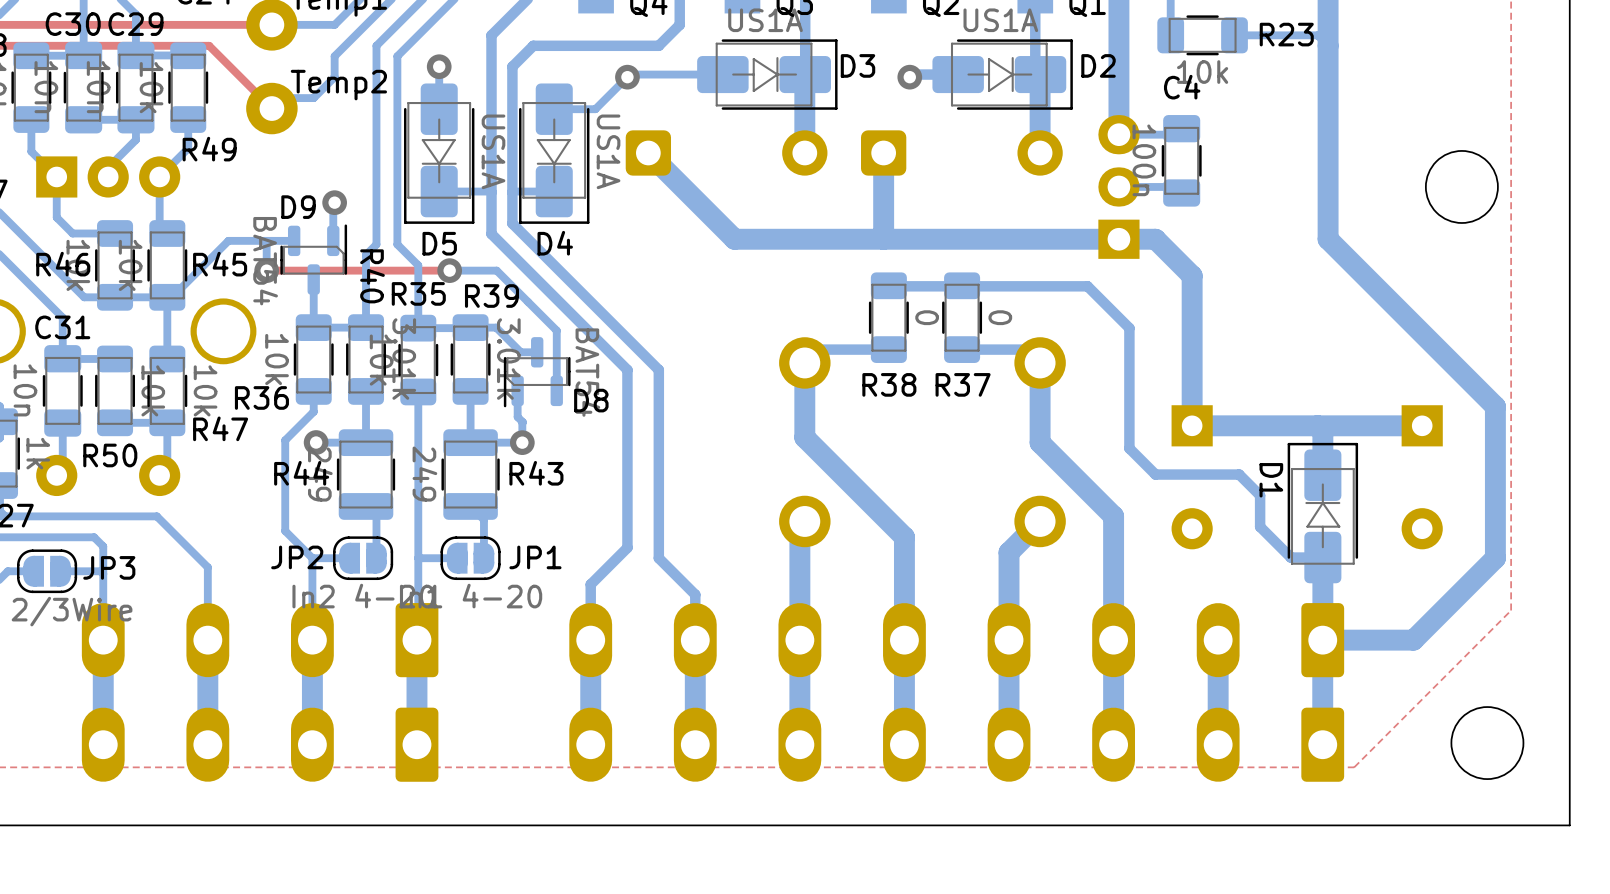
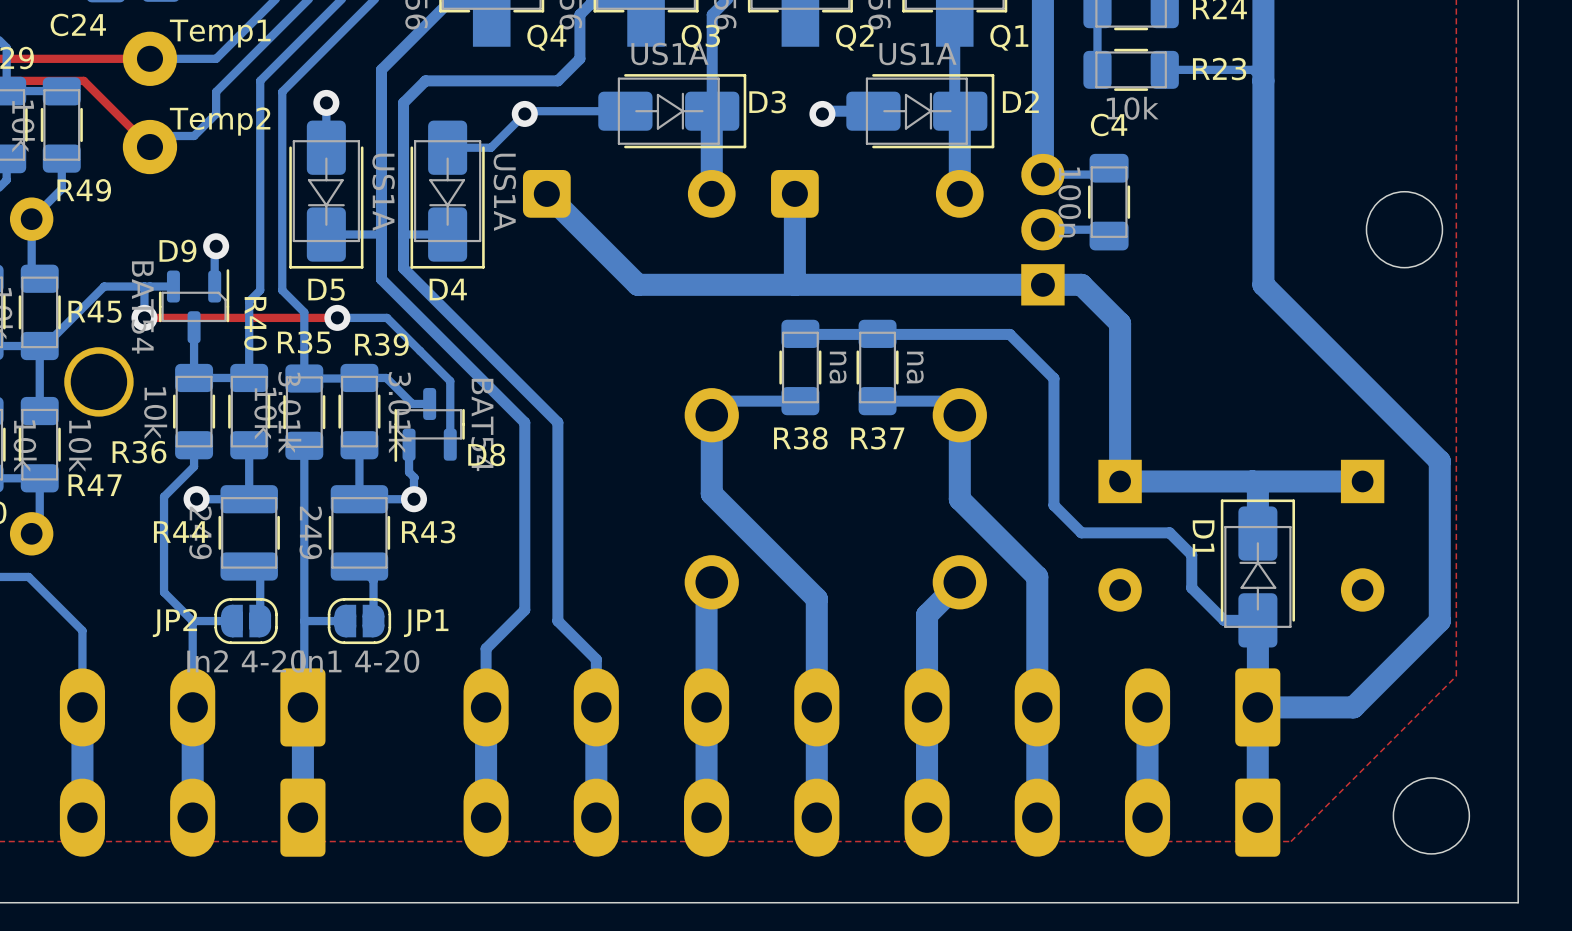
R38 value: 0 (927, 317) -> na (837, 367)
R37 value: 0 (1000, 317) -> na (915, 367)

